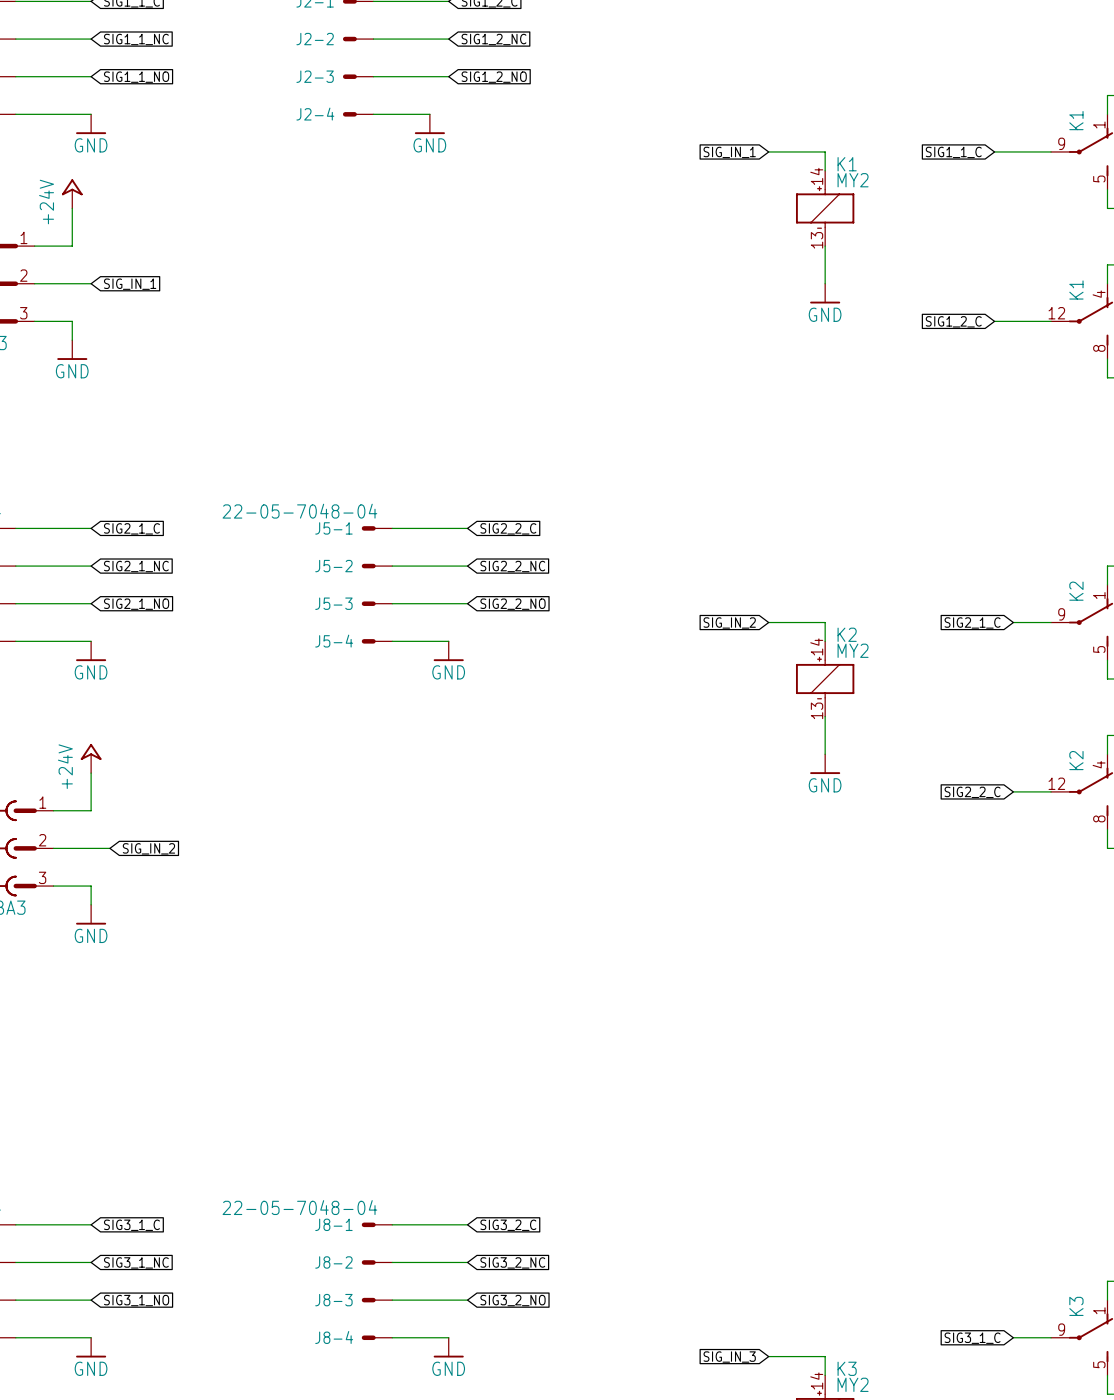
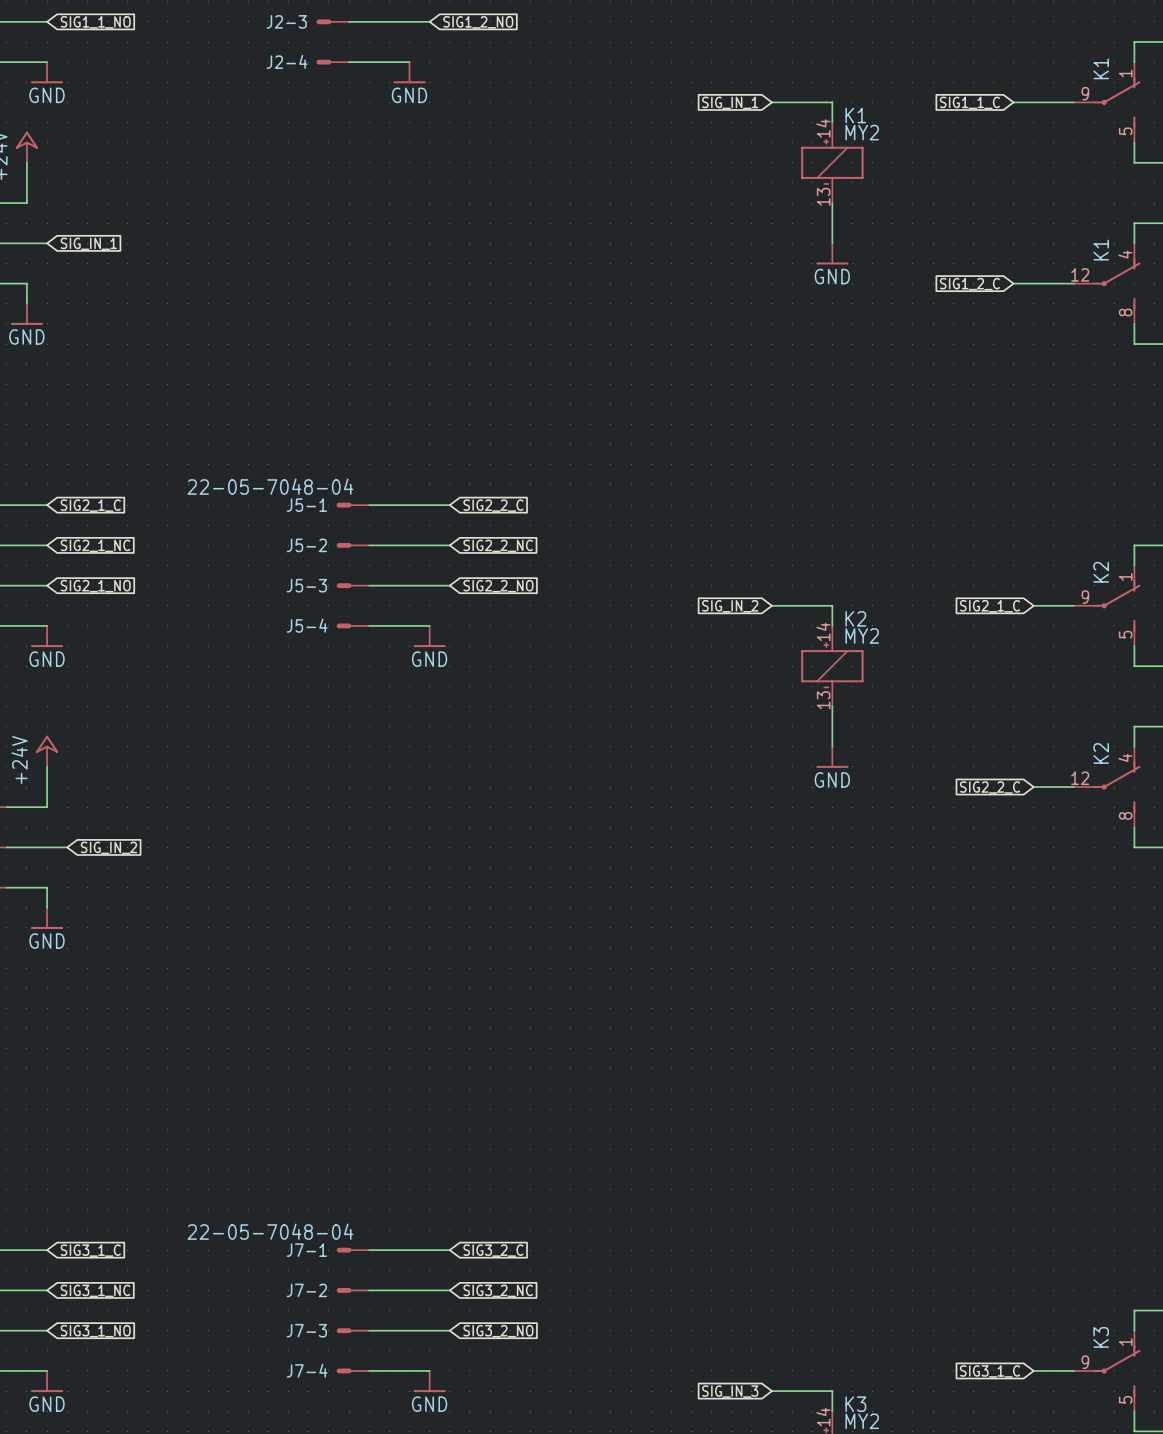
J8-1 name: J8-1 (333, 1224) -> J7-1 (306, 1250)
J8-2 name: J8-2 (333, 1262) -> J7-2 (306, 1290)
J8-3 name: J8-3 (333, 1300) -> J7-3 (306, 1330)
J8-4 name: J8-4 (334, 1337) -> J7-4 (307, 1370)

